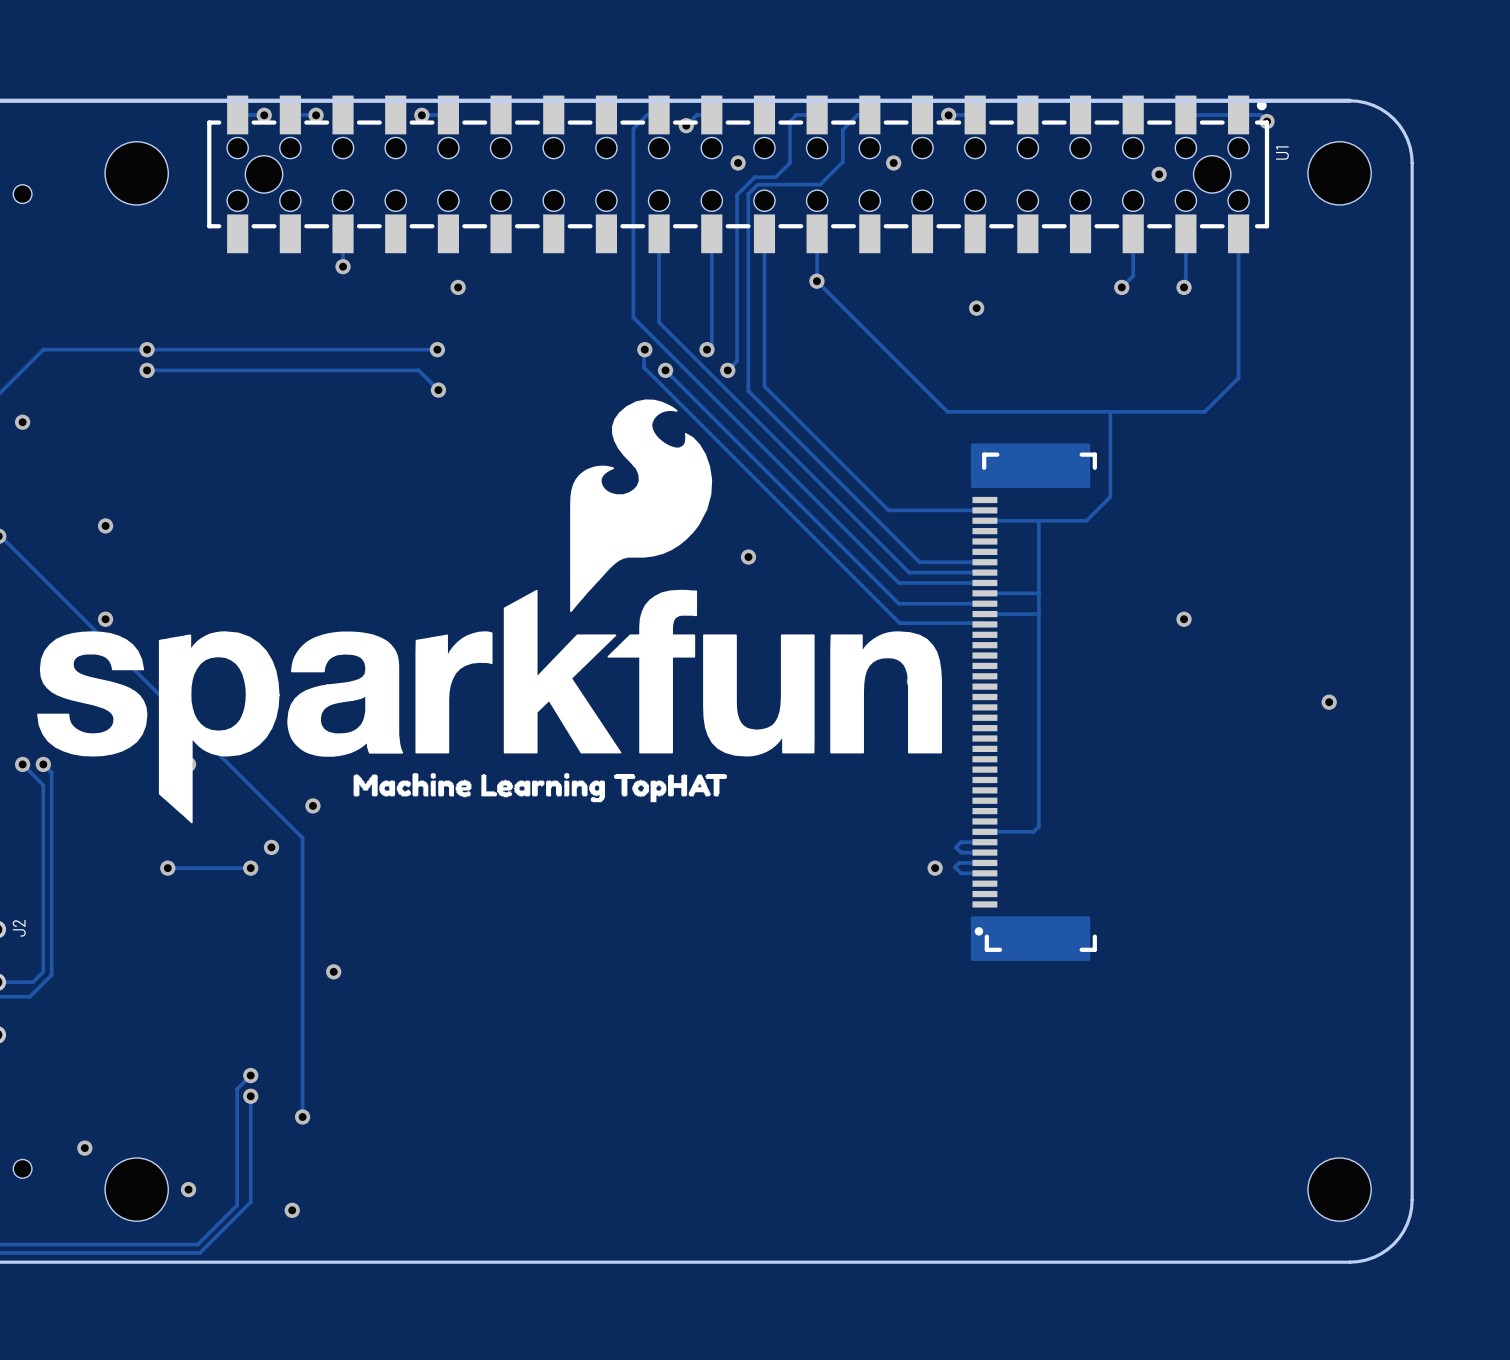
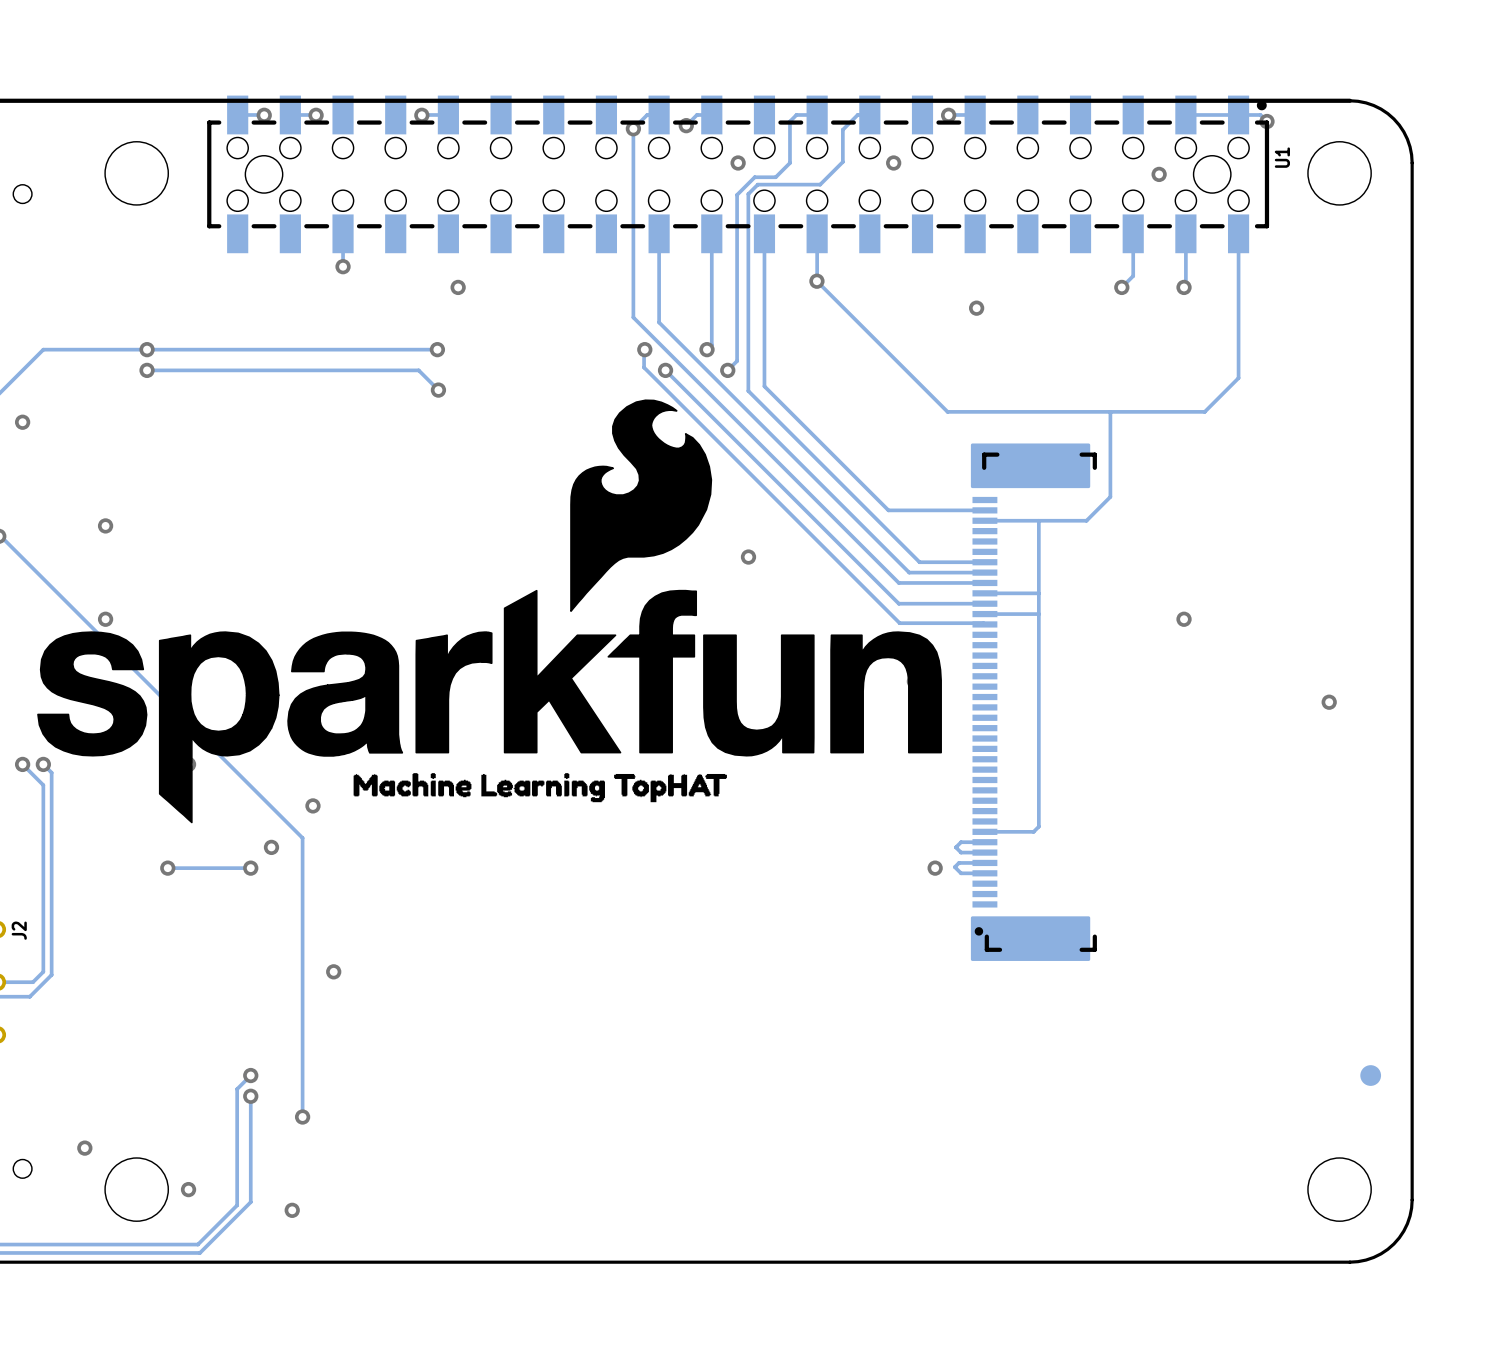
via: none -> (633, 128)
part: none -> (1370, 1075)

